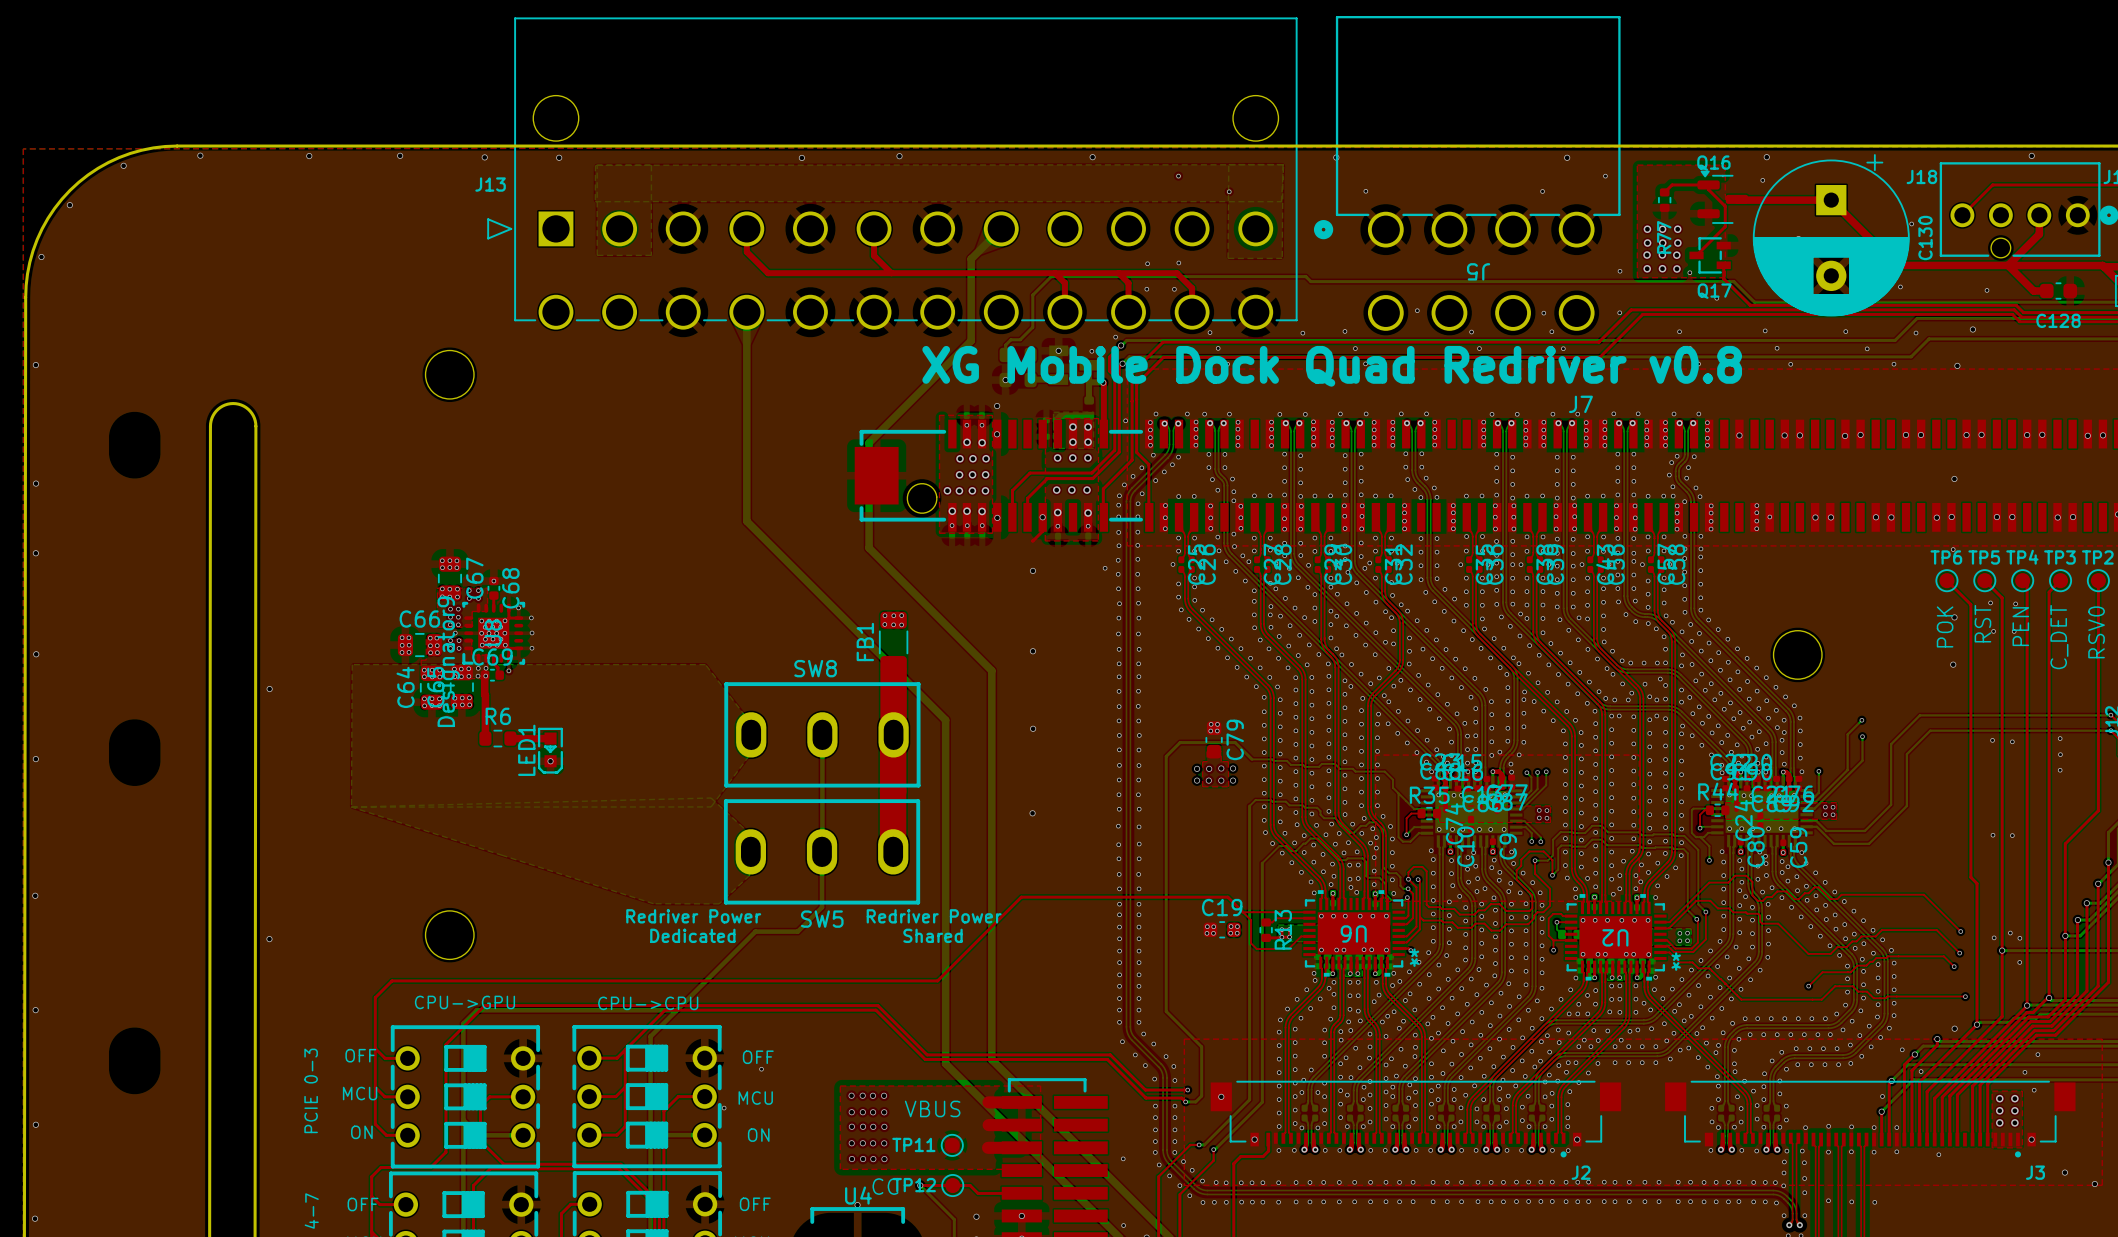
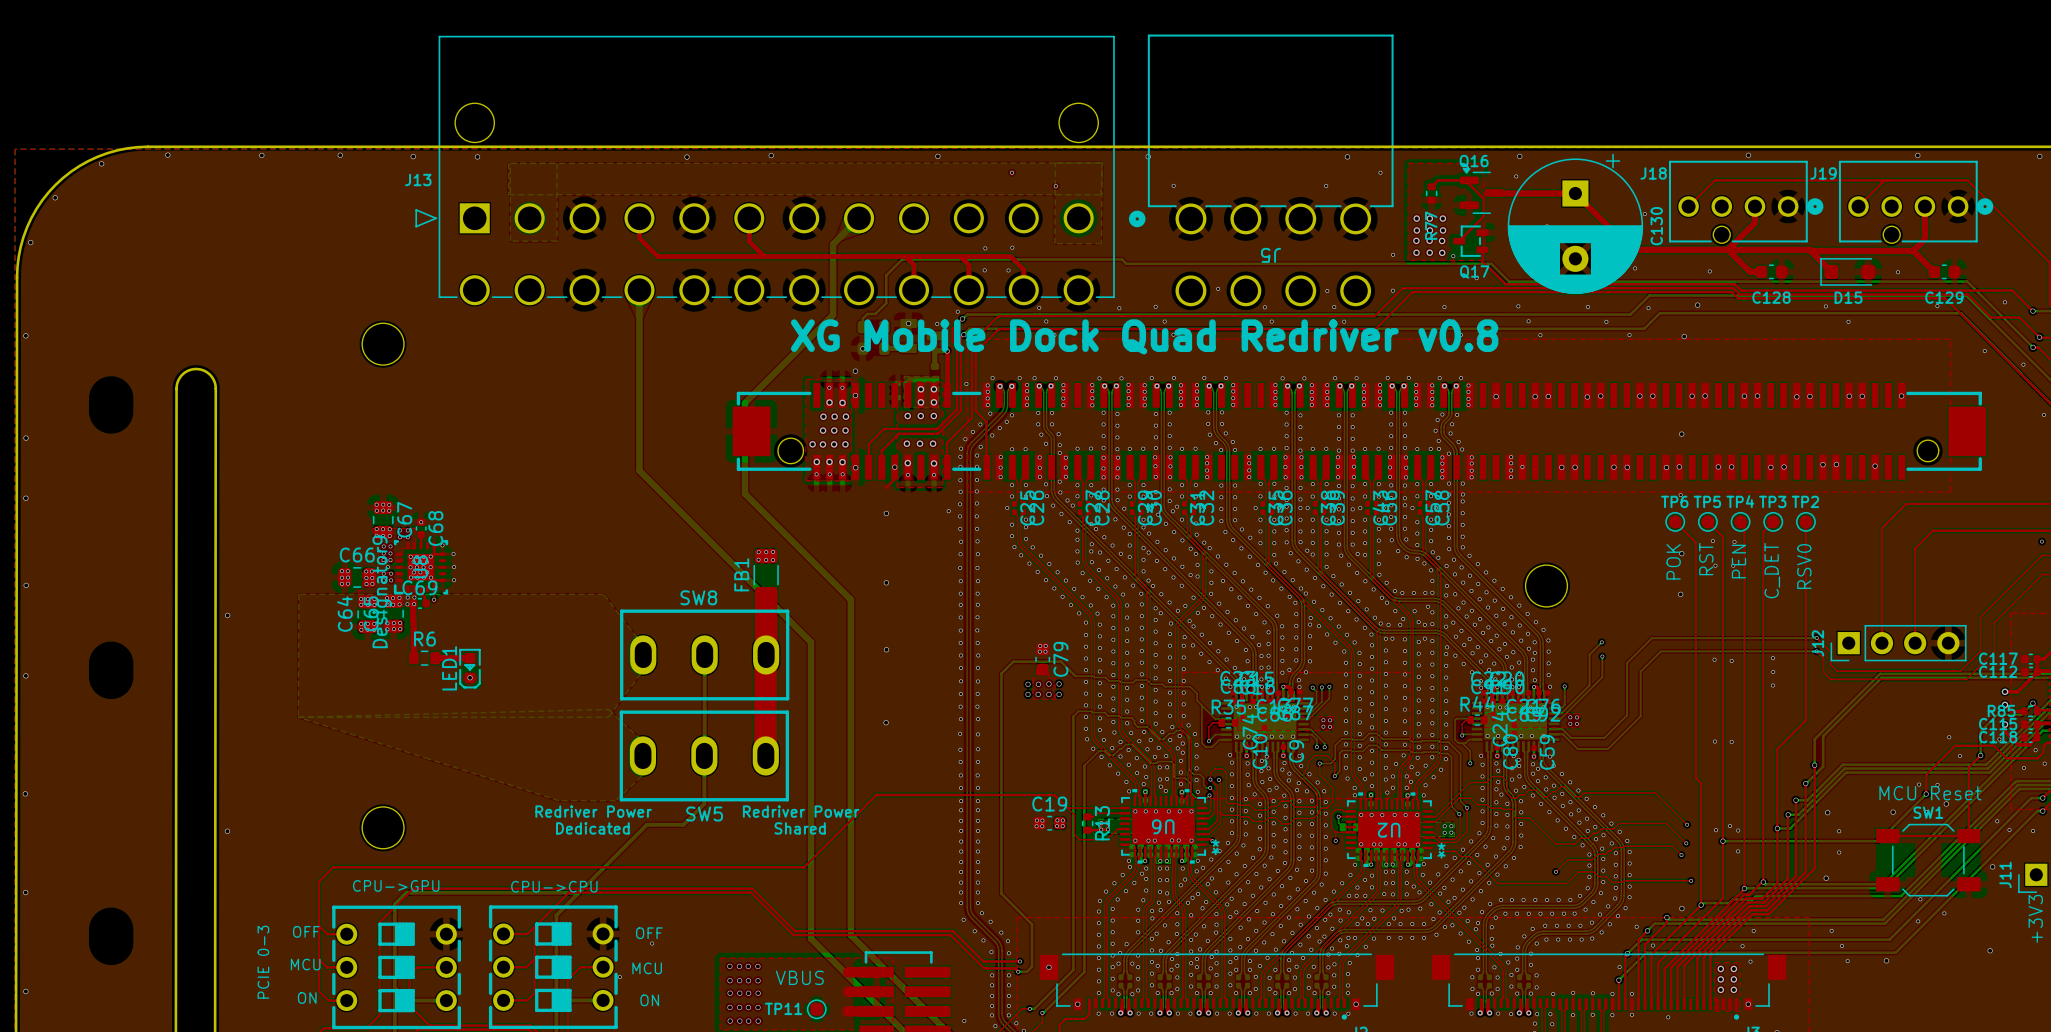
J7 name: J7 (1580, 404) -> none

